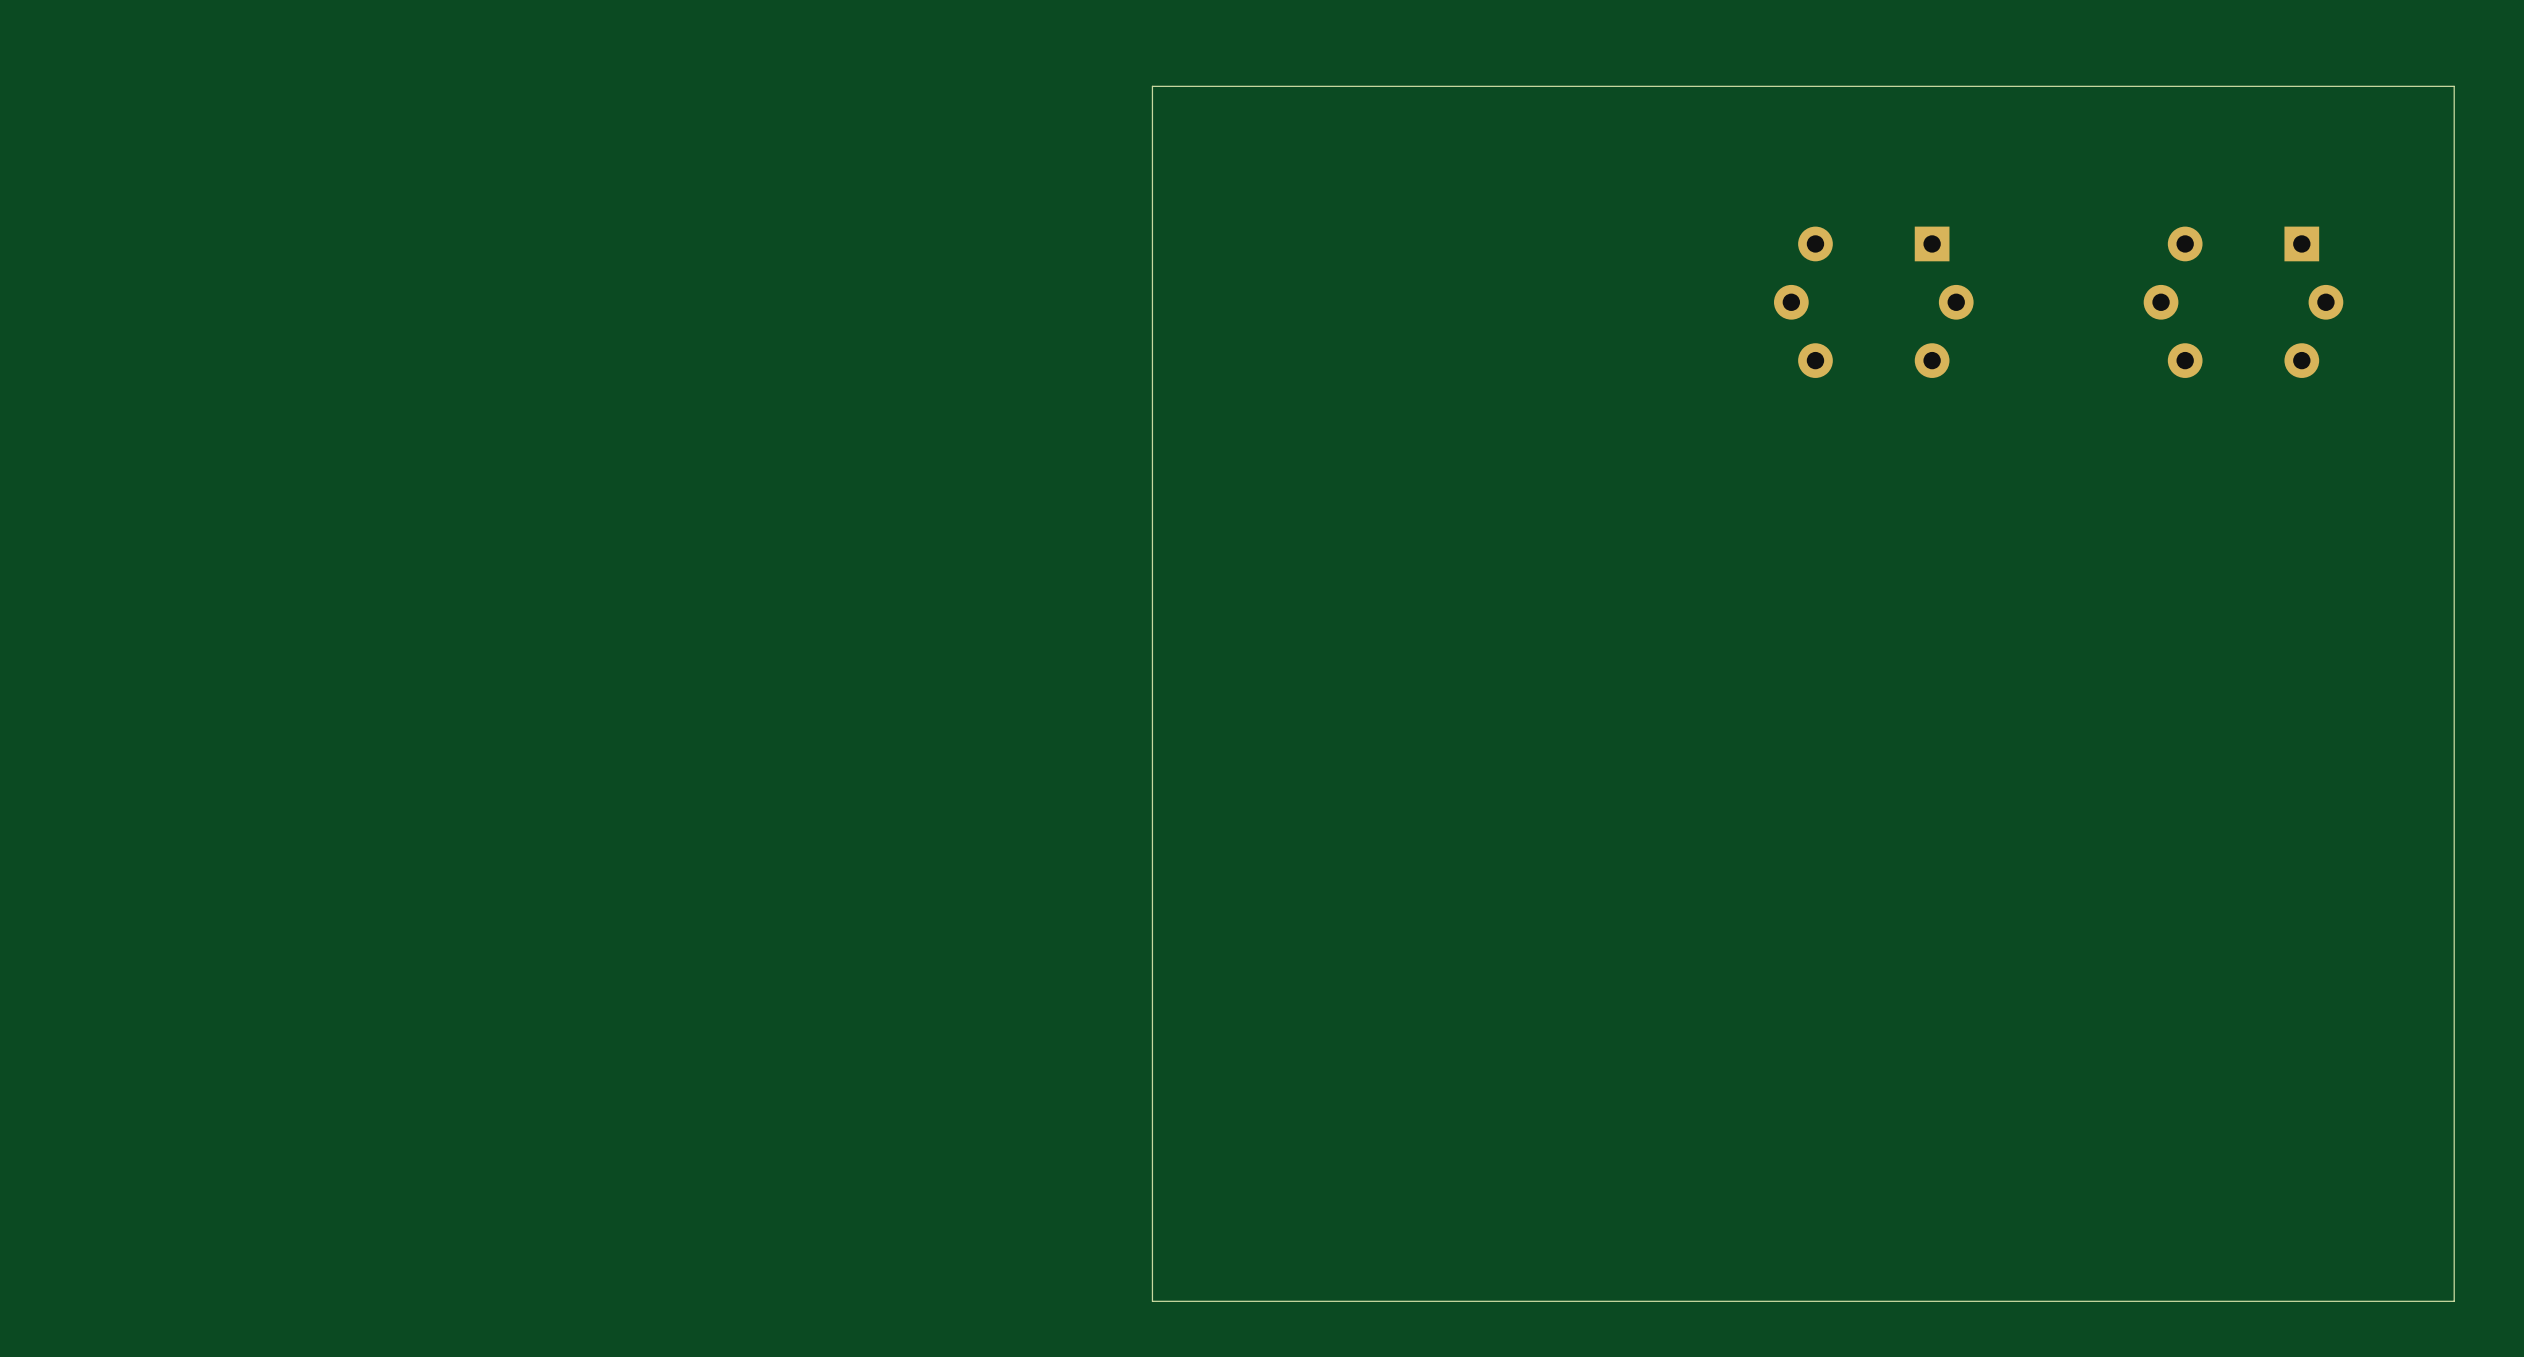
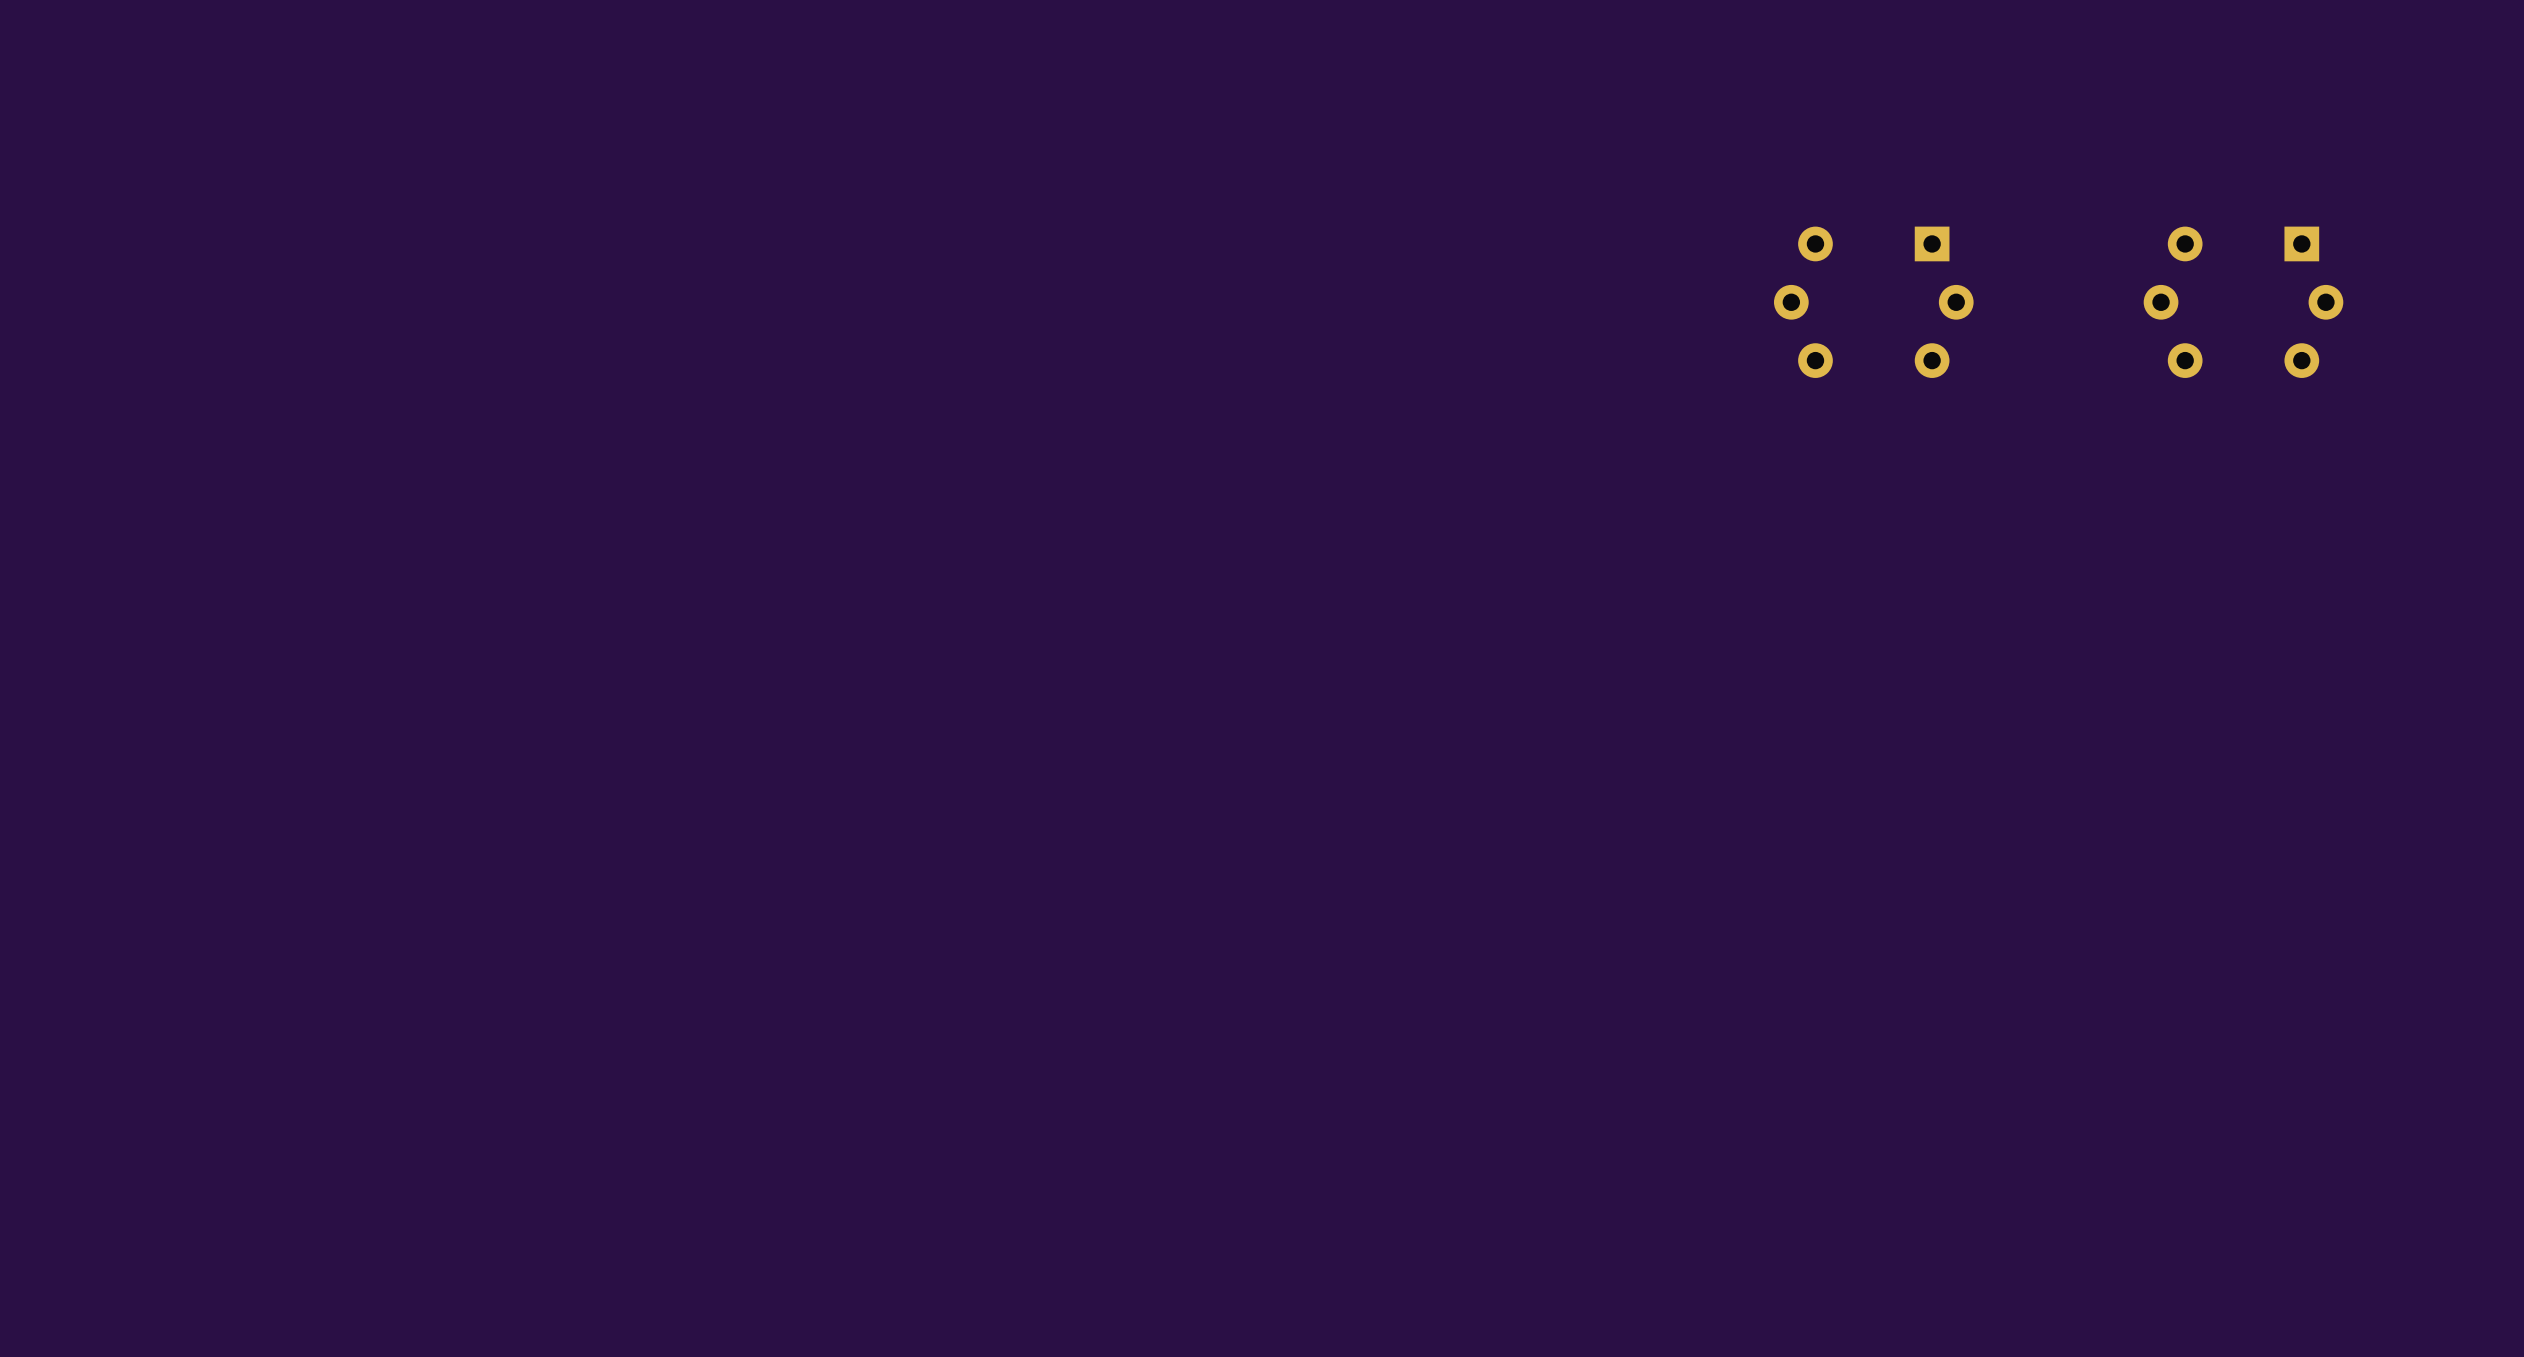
board edge: (2454, 86) (1152, 86) (1152, 1301) (2454, 1301) (2454, 86) -> none

